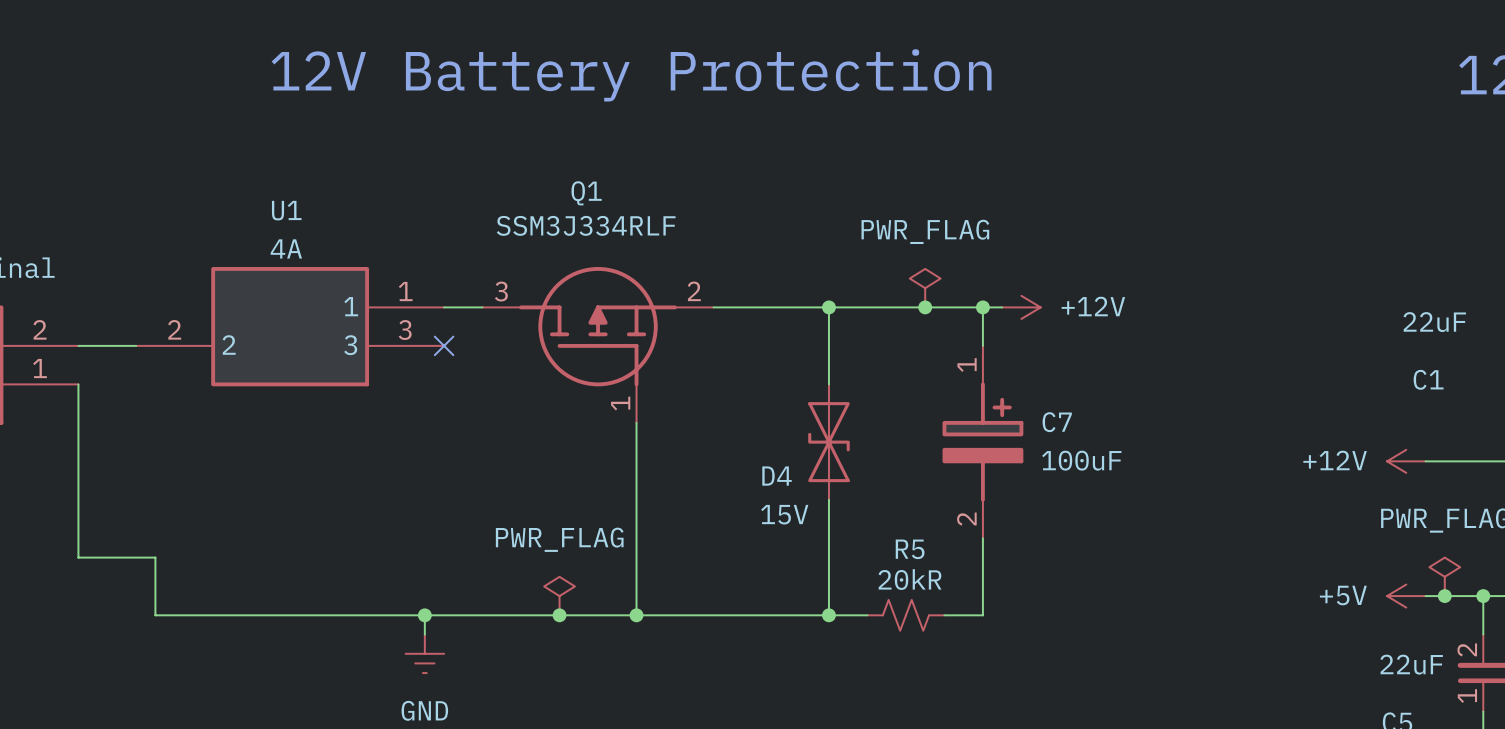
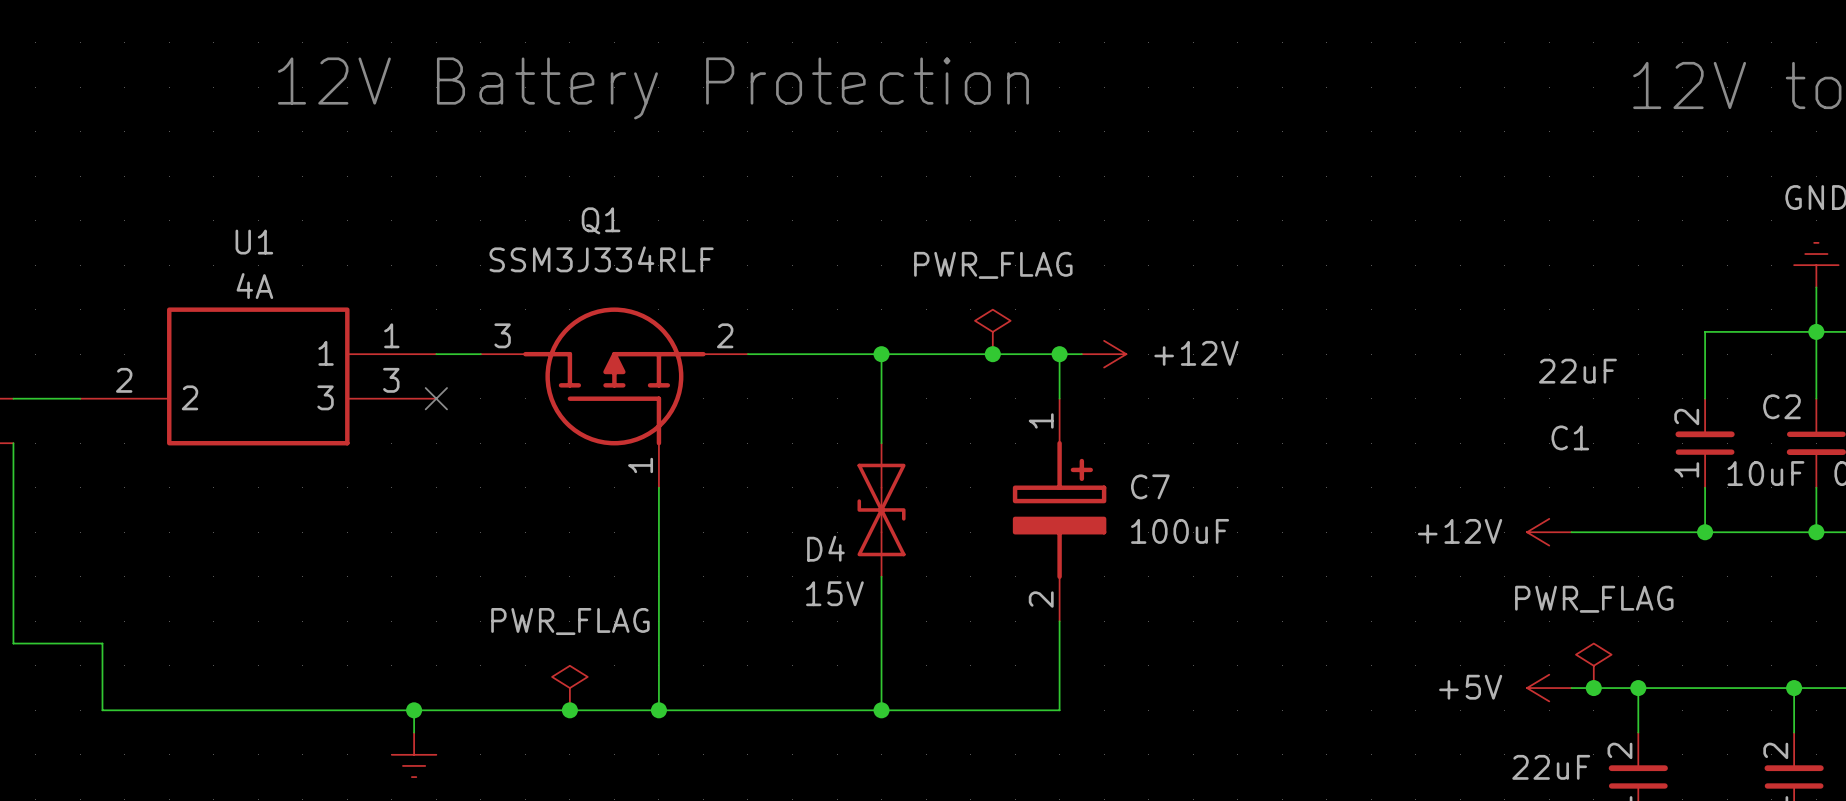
wire: none -> (926, 710) (1015, 710)
R5: 20kR (905, 615) -> none

